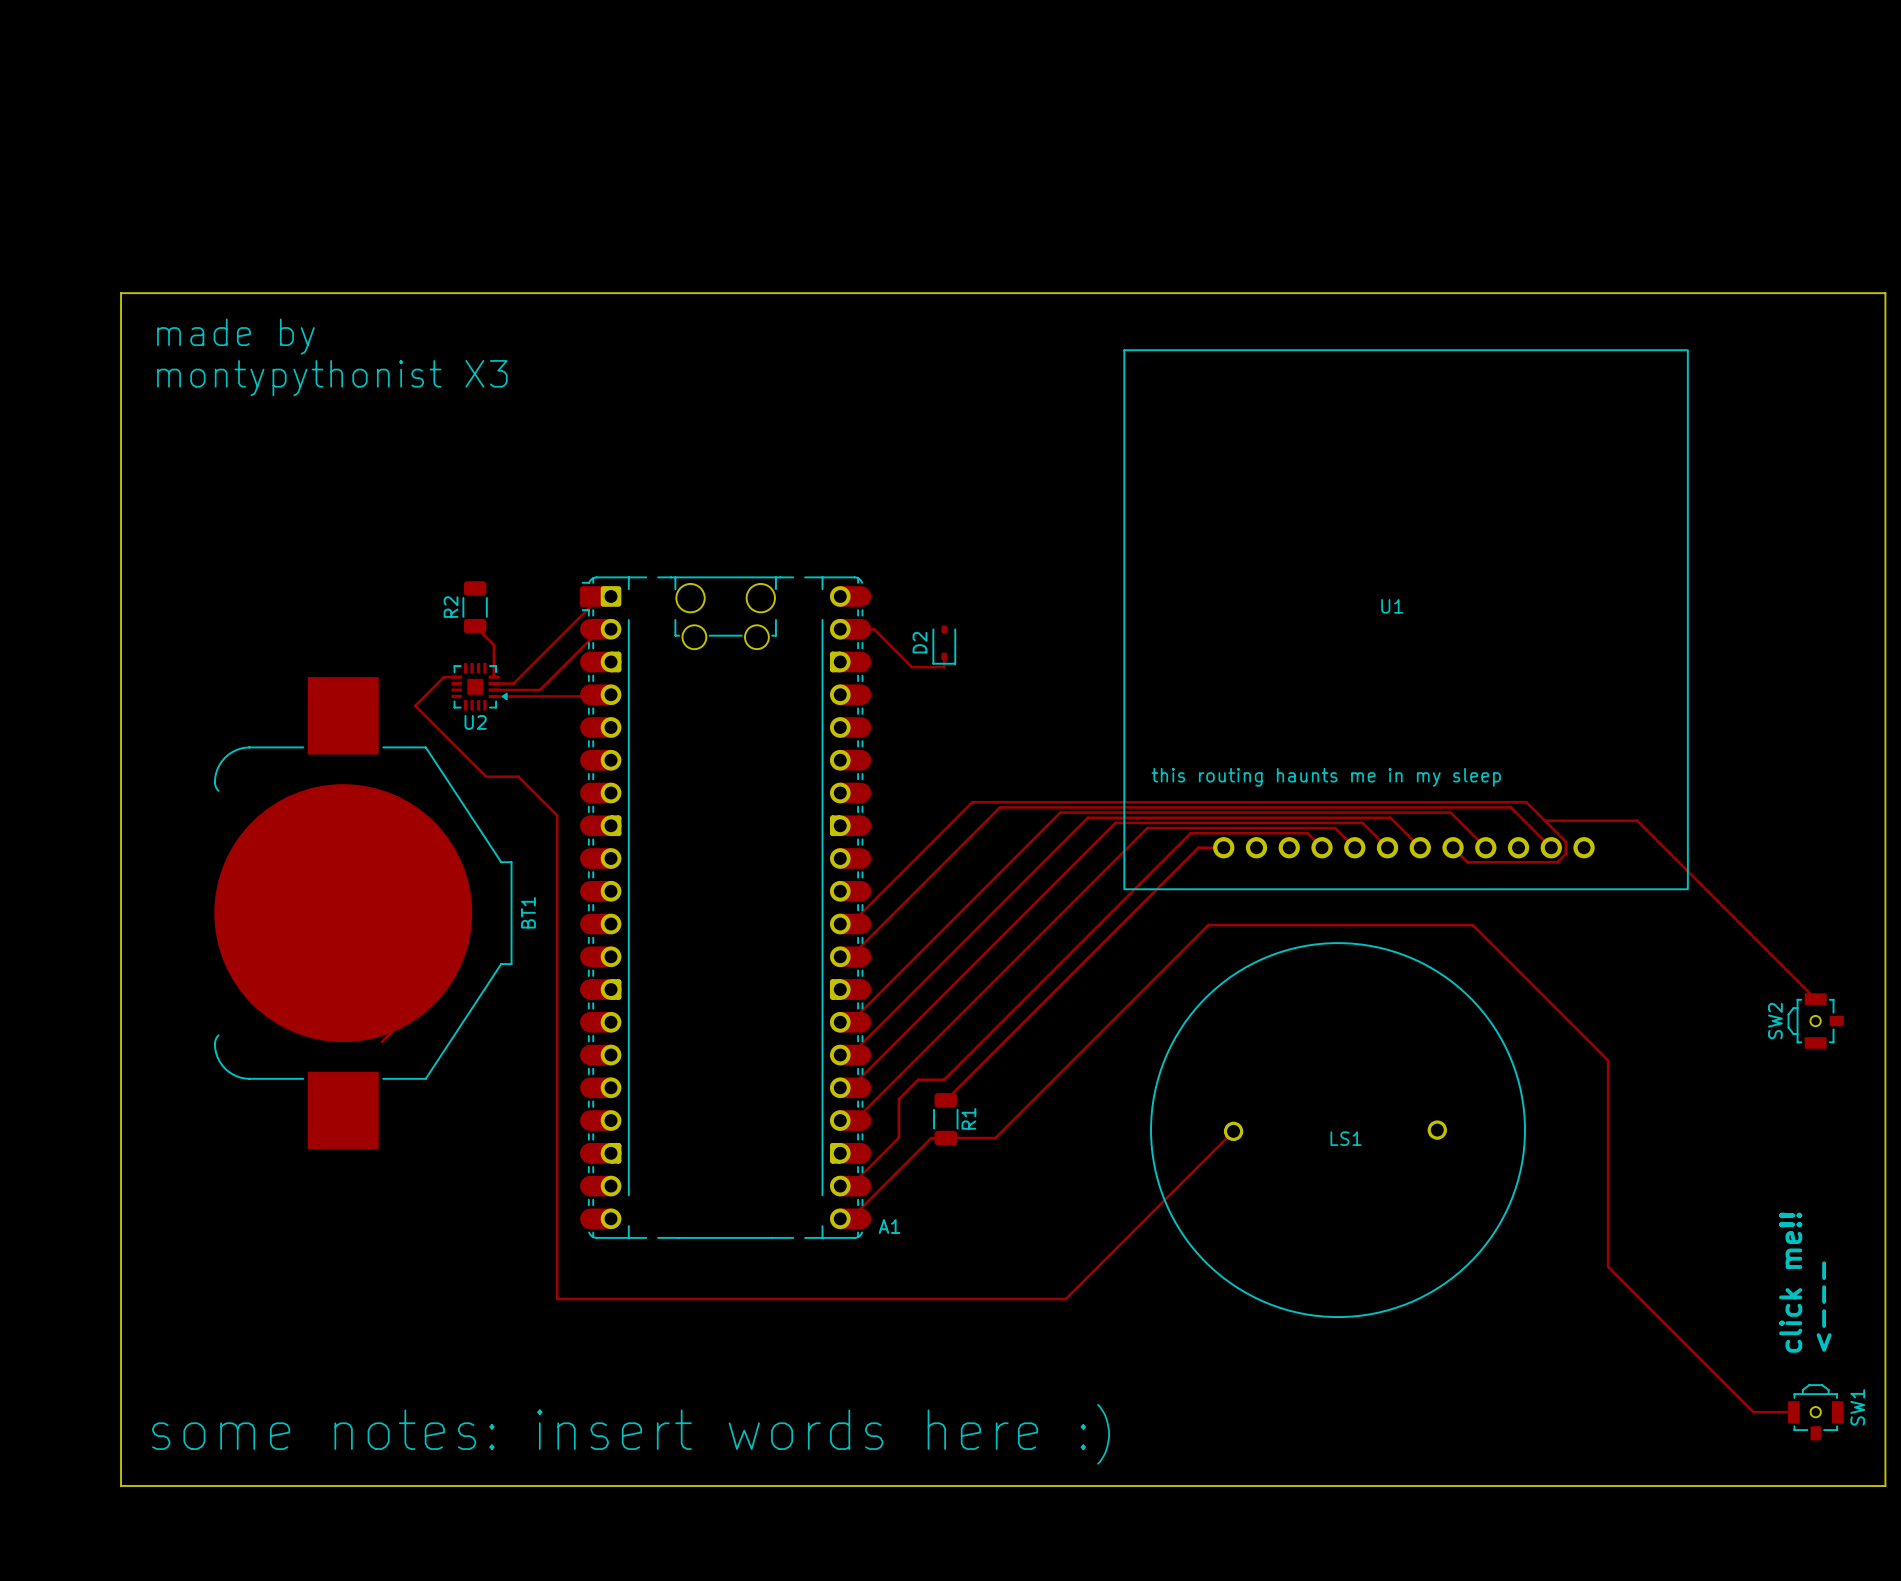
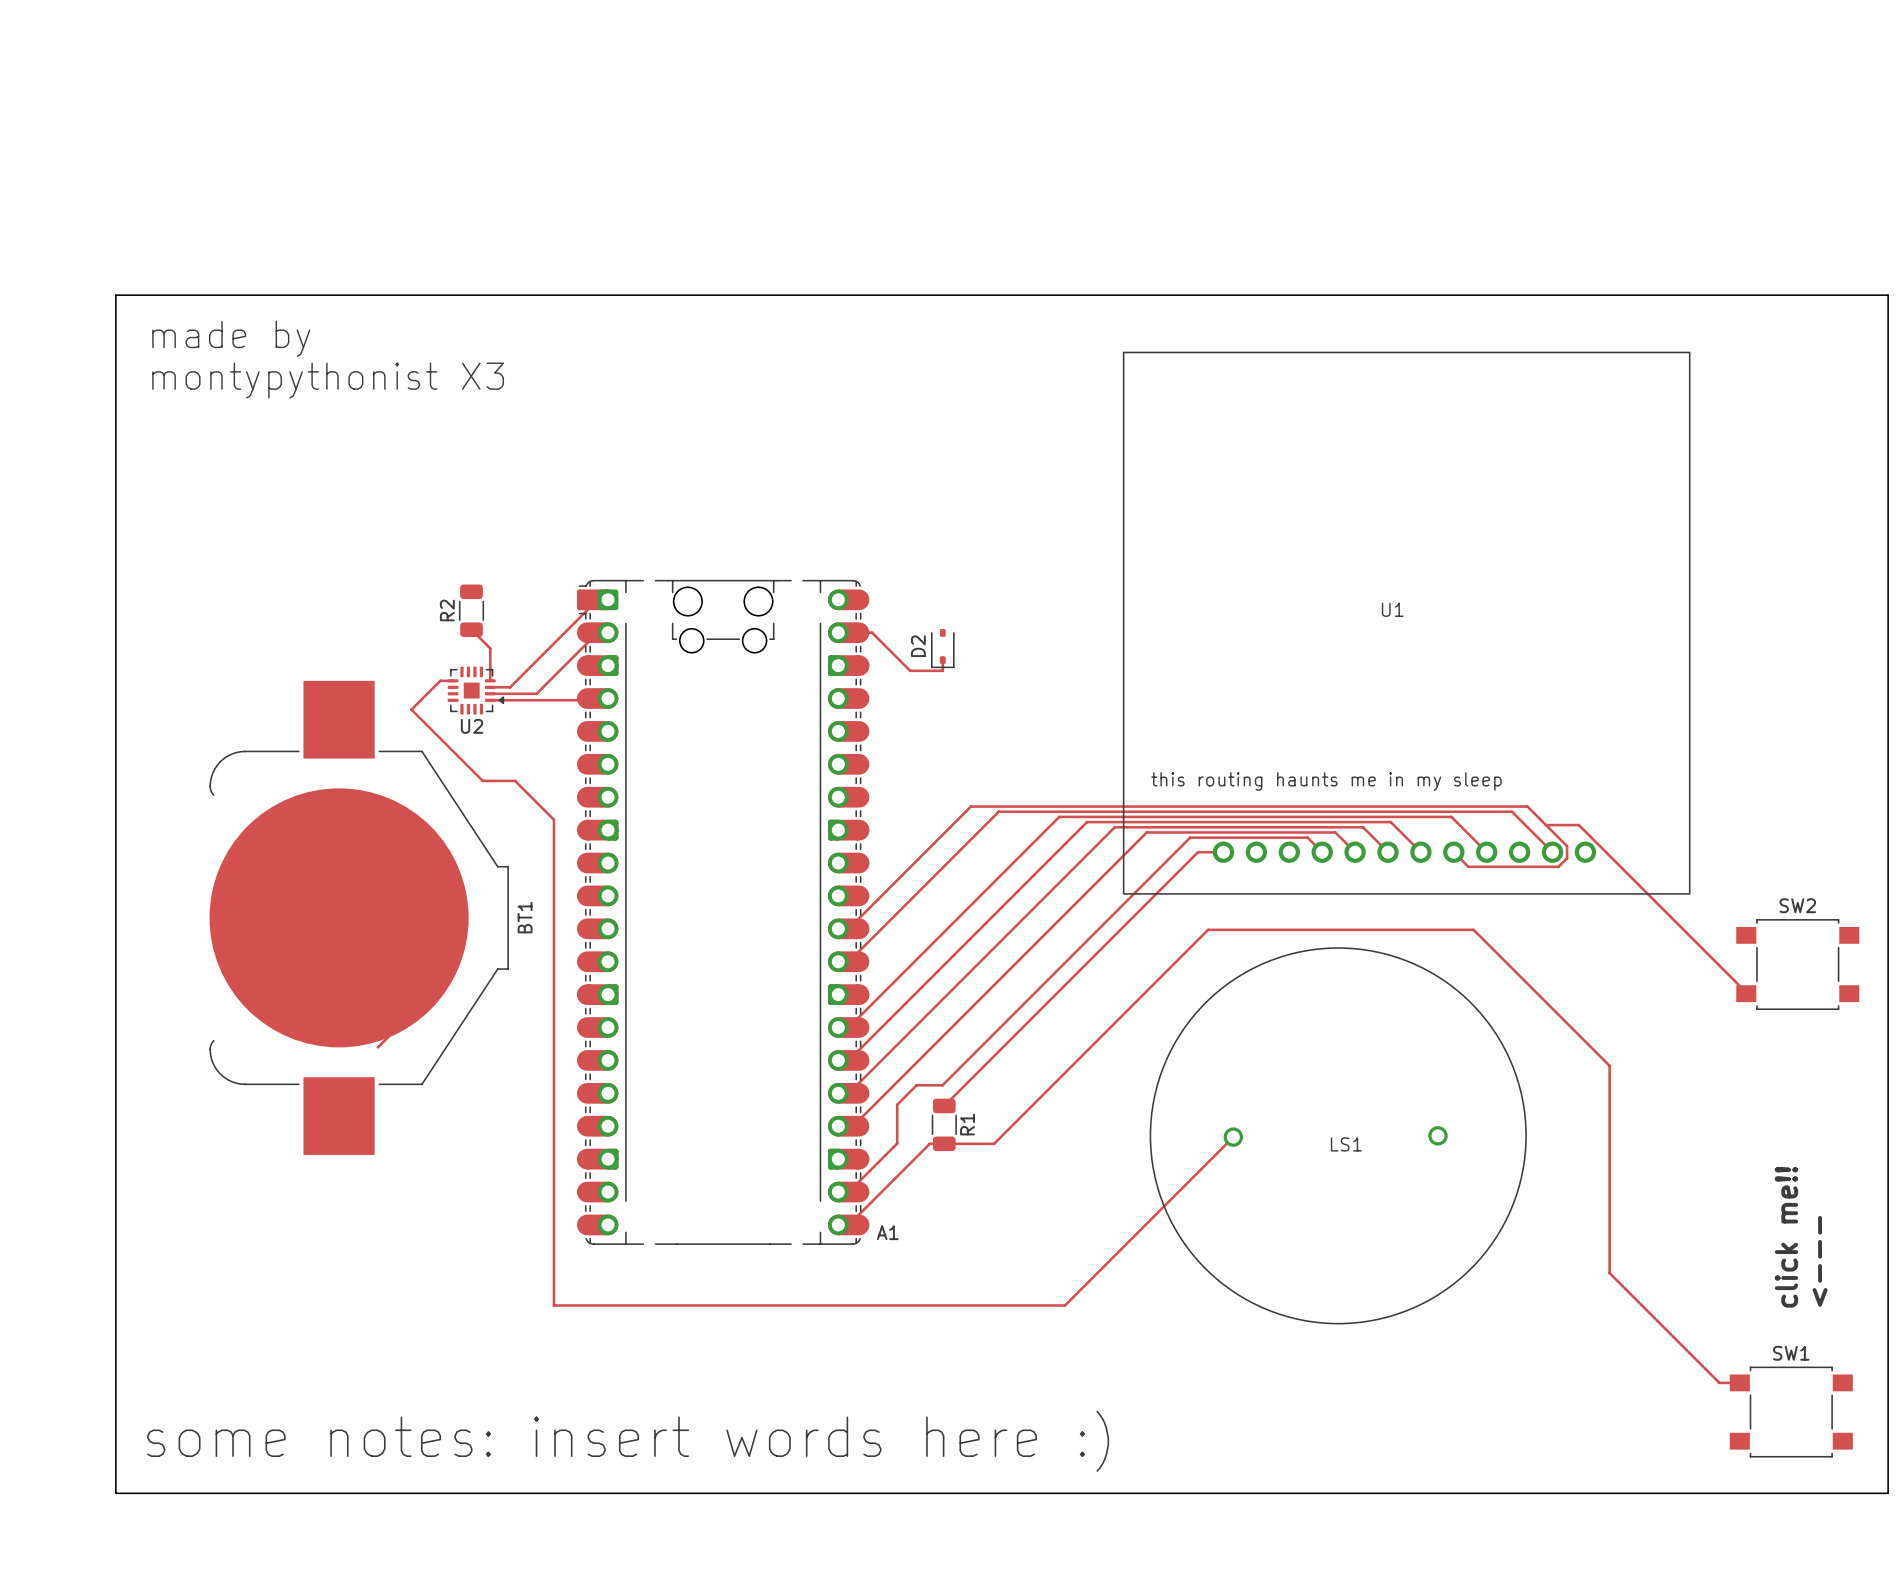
top track: (1577, 820) (1637, 820) (1815, 999) -> (1578, 825) (1746, 993)
SW2 footprint: [1787, 993, 1844, 1049] -> [1736, 919, 1860, 1010]
SW2 name position: SW2 (1775, 1021) -> SW2 (1797, 905)
text position: click me!! (1790, 1282) -> click me!! (1786, 1237)
text position: <--- (1824, 1306) -> <--- (1820, 1261)
top track: (1717, 1376) (1753, 1412) (1793, 1412) -> (1719, 1382) (1739, 1382)
SW1 footprint: [1788, 1384, 1844, 1441] -> [1729, 1366, 1853, 1458]
SW1 name position: SW1 (1857, 1407) -> SW1 (1791, 1353)

